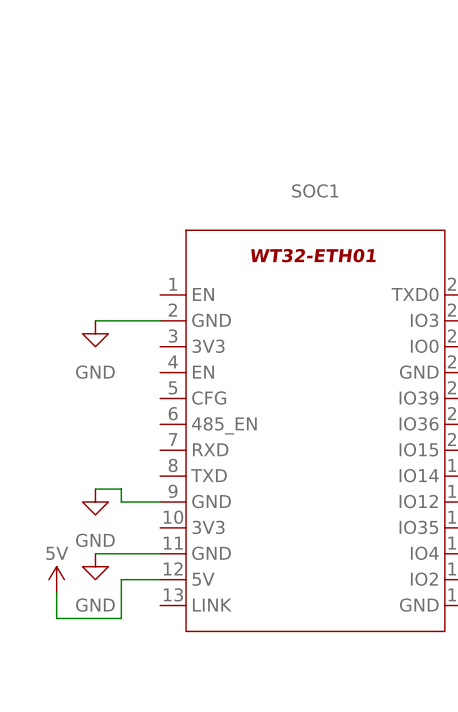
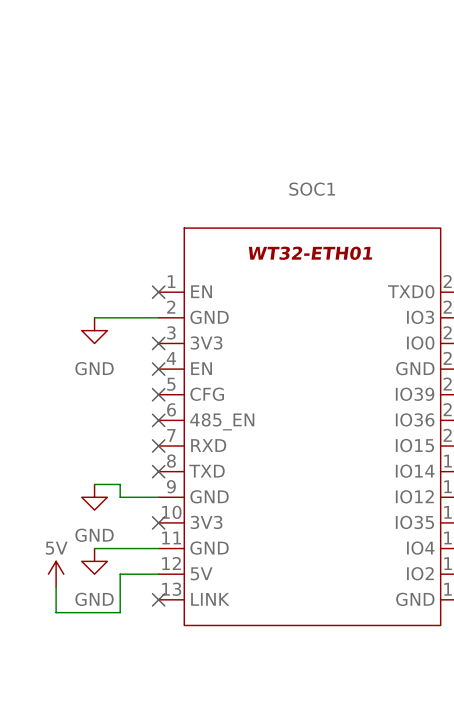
no-connect mark: none -> (158, 292)
no-connect mark: none -> (158, 343)
no-connect mark: none -> (158, 369)
no-connect mark: none -> (158, 394)
no-connect mark: none -> (158, 420)
no-connect mark: none -> (158, 446)
no-connect mark: none -> (158, 471)
no-connect mark: none -> (158, 522)
no-connect mark: none -> (158, 599)

